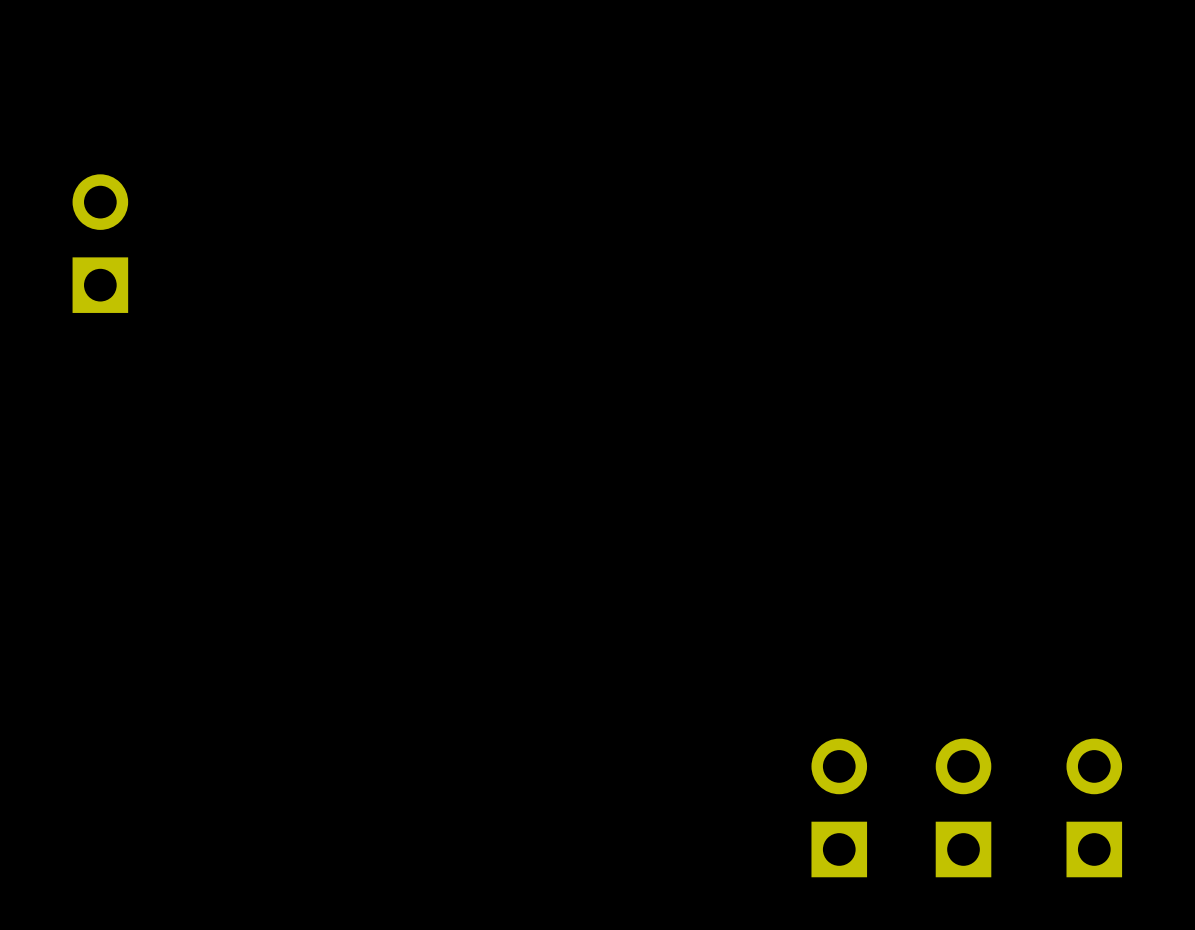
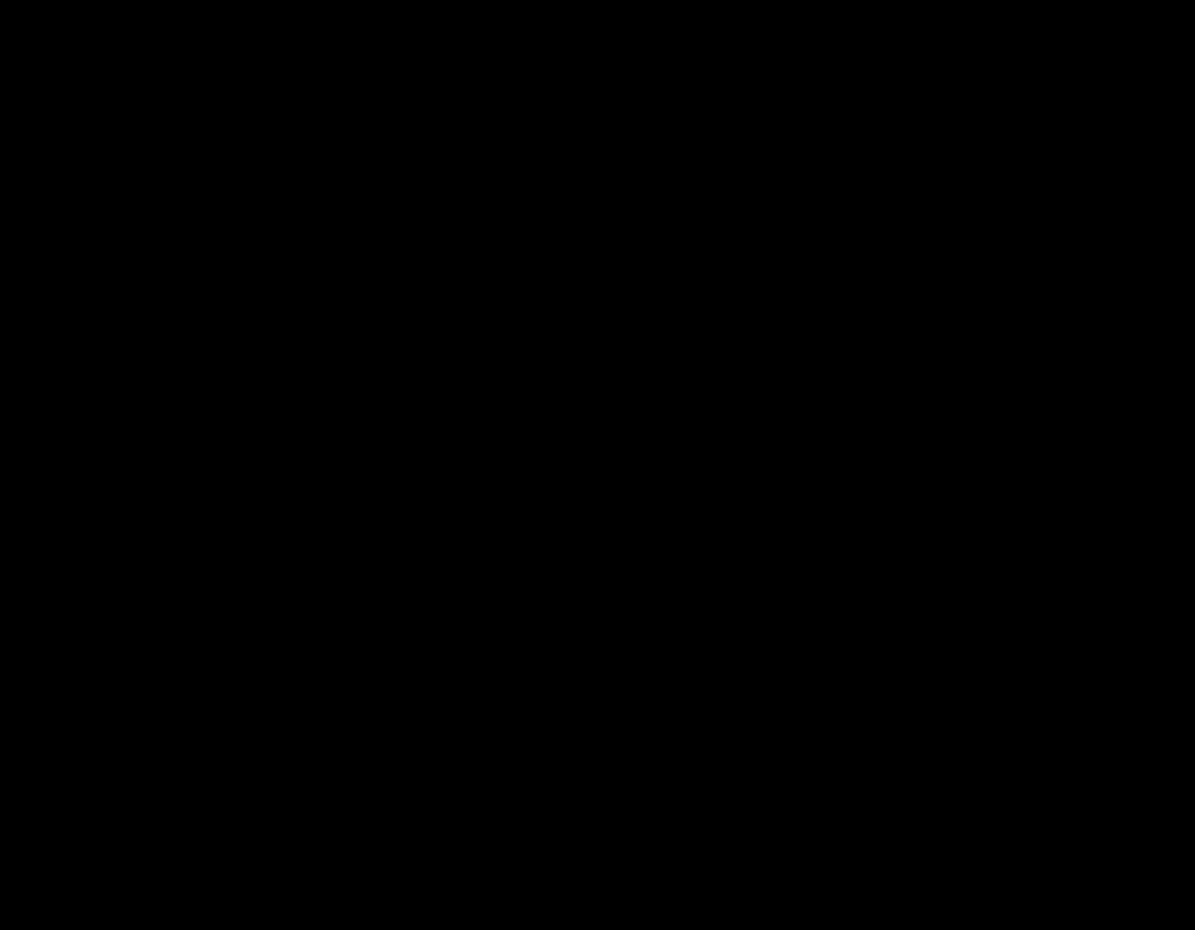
part: (100, 243) -> none
part: (839, 807) -> none
part: (963, 807) -> none
part: (1094, 807) -> none

